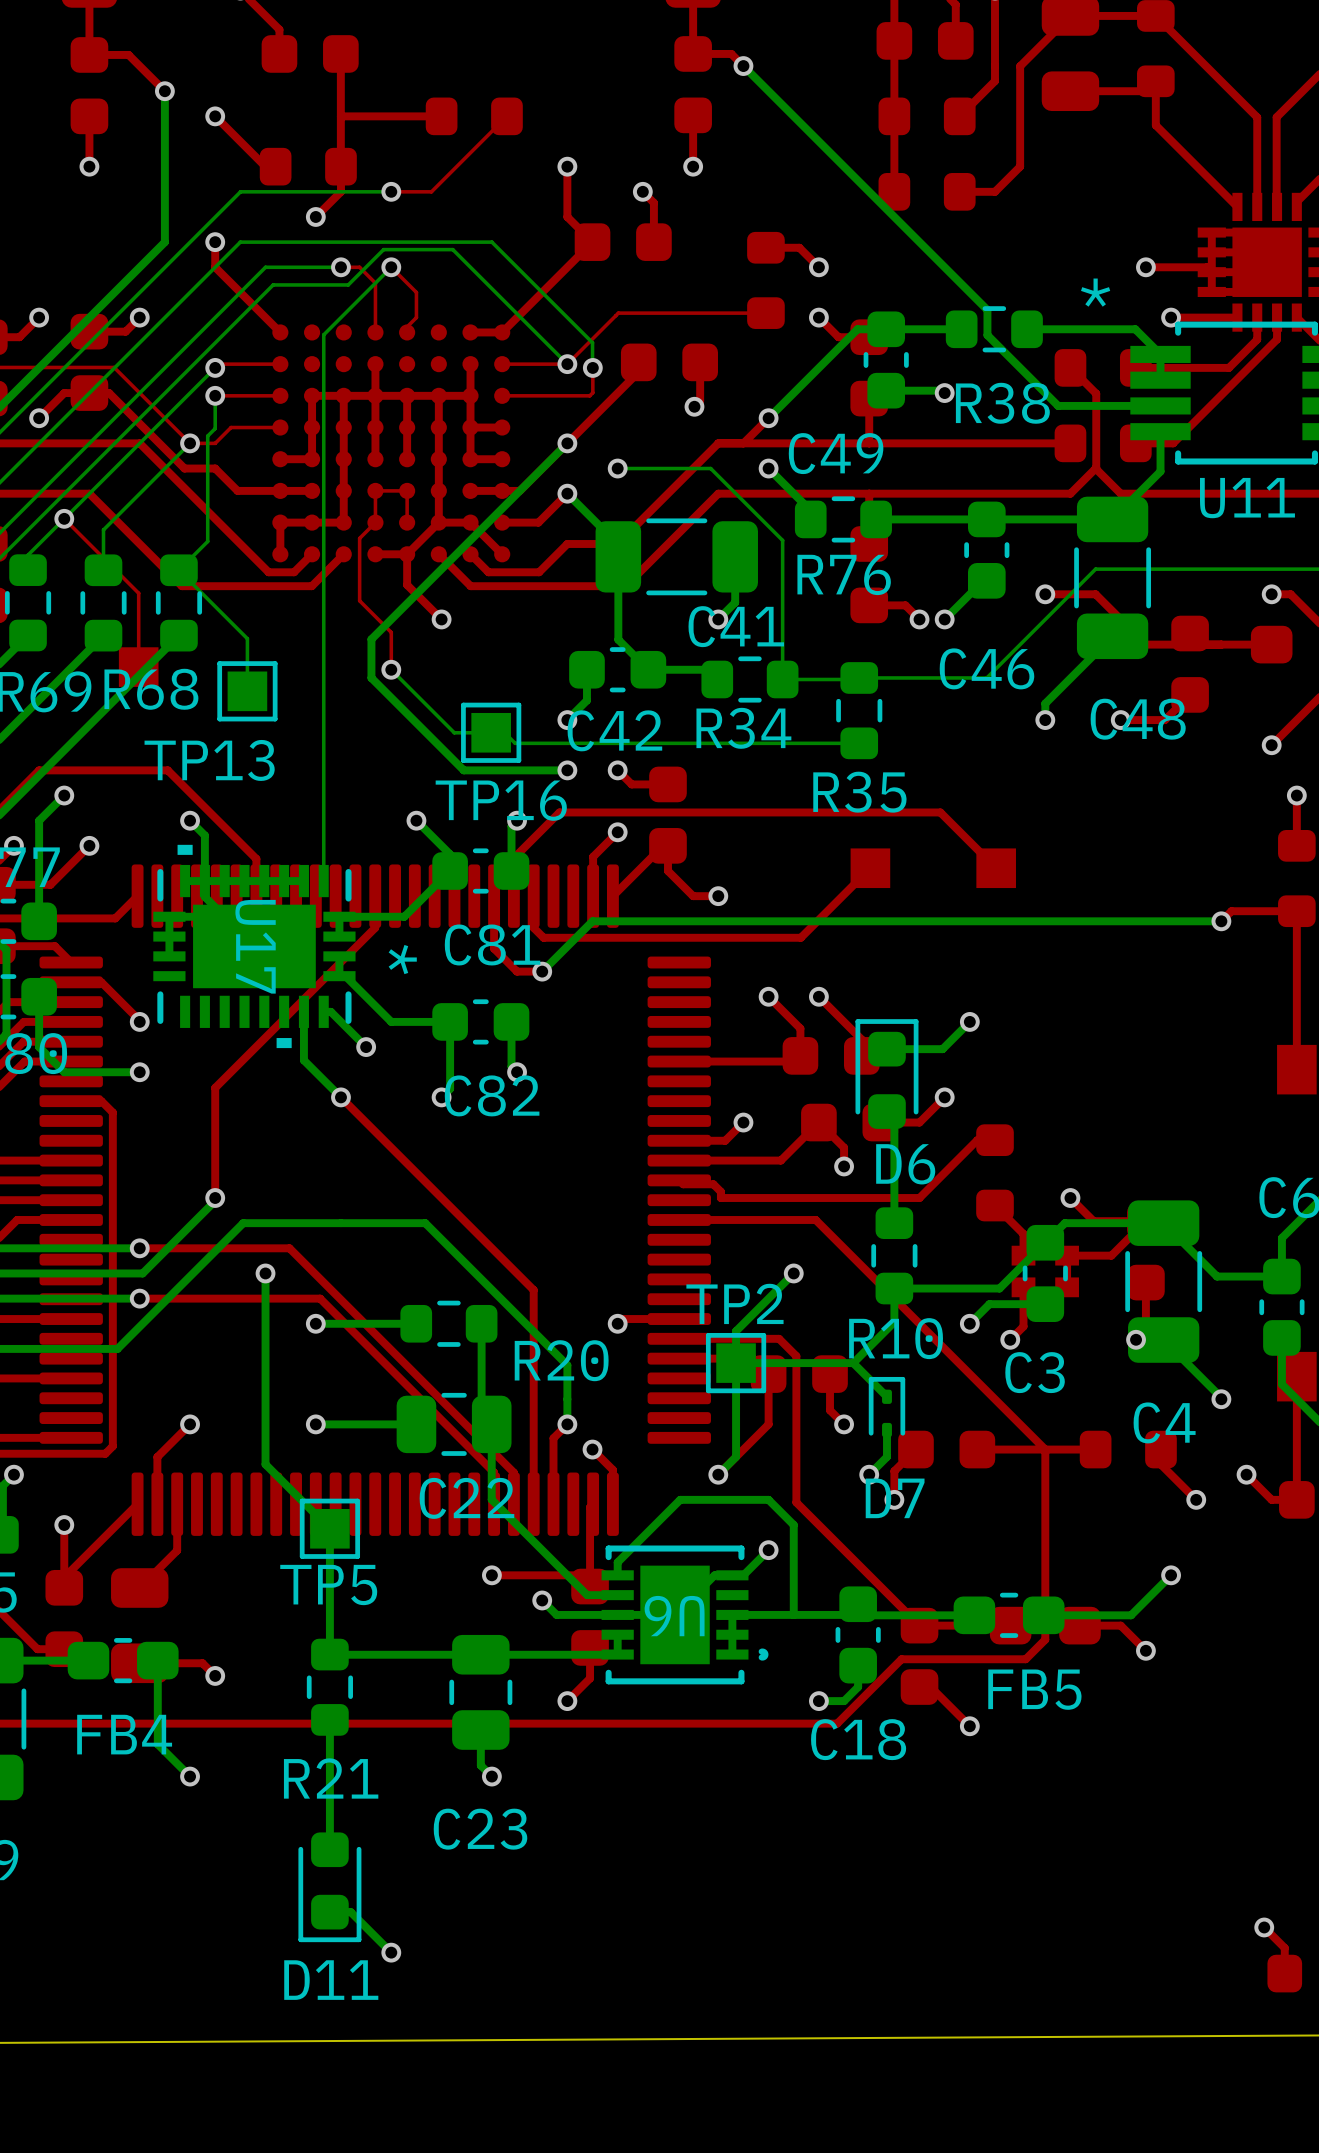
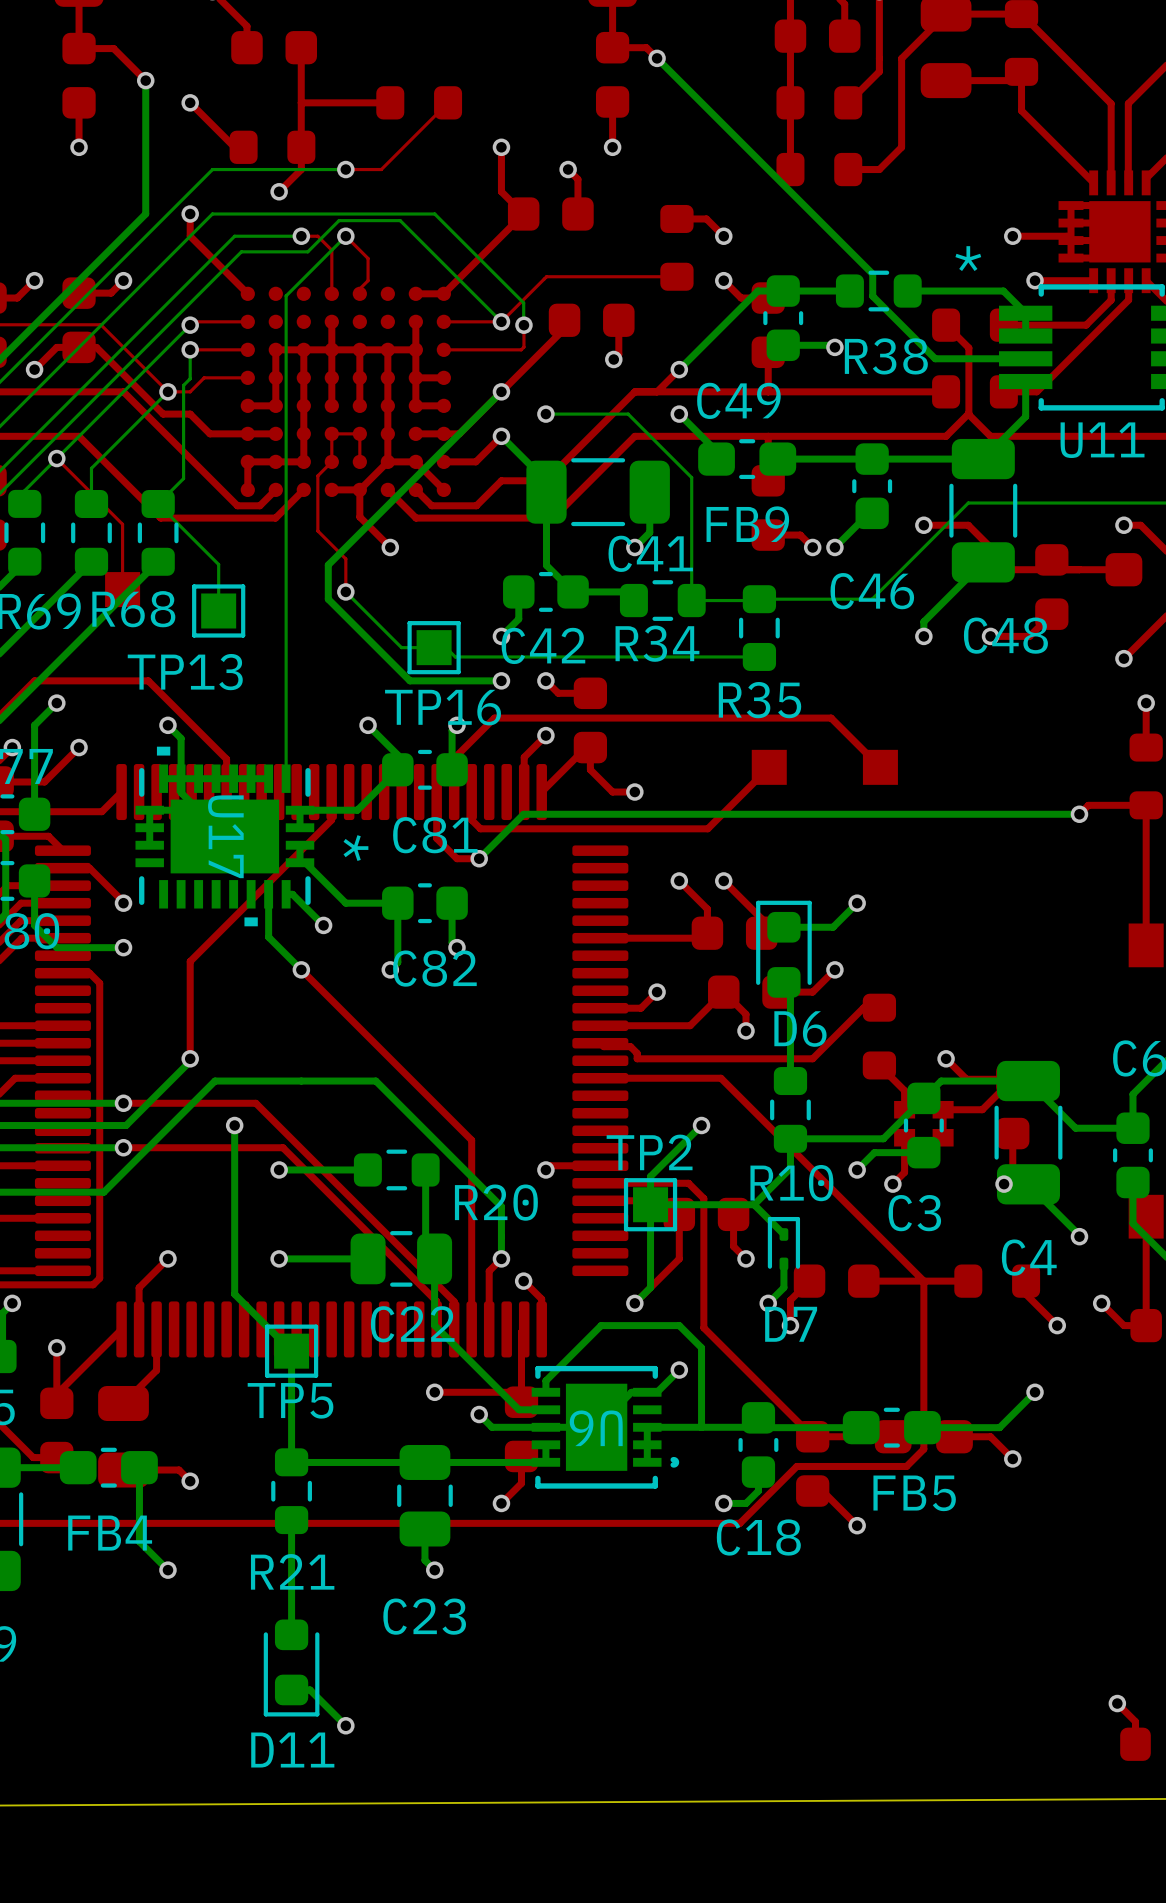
R76: (843, 519) -> none
FB9: none -> (747, 459)

